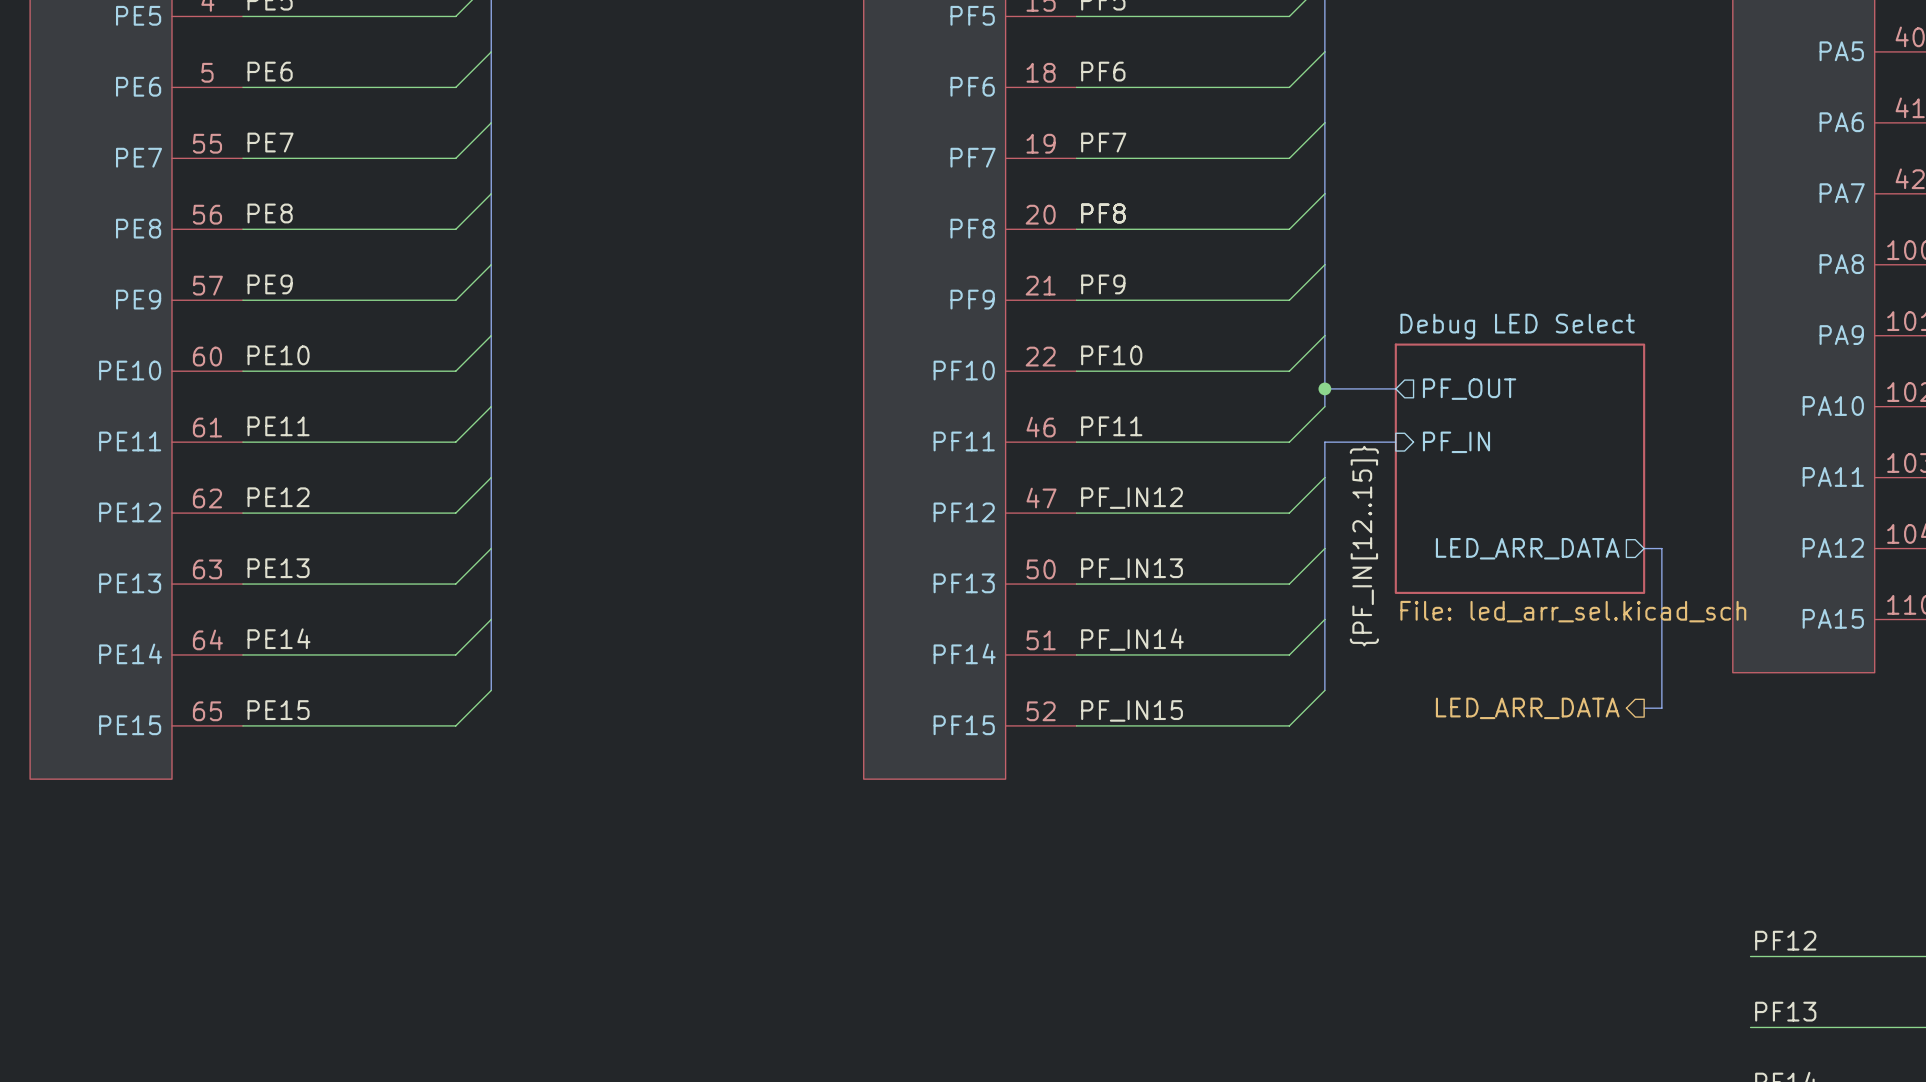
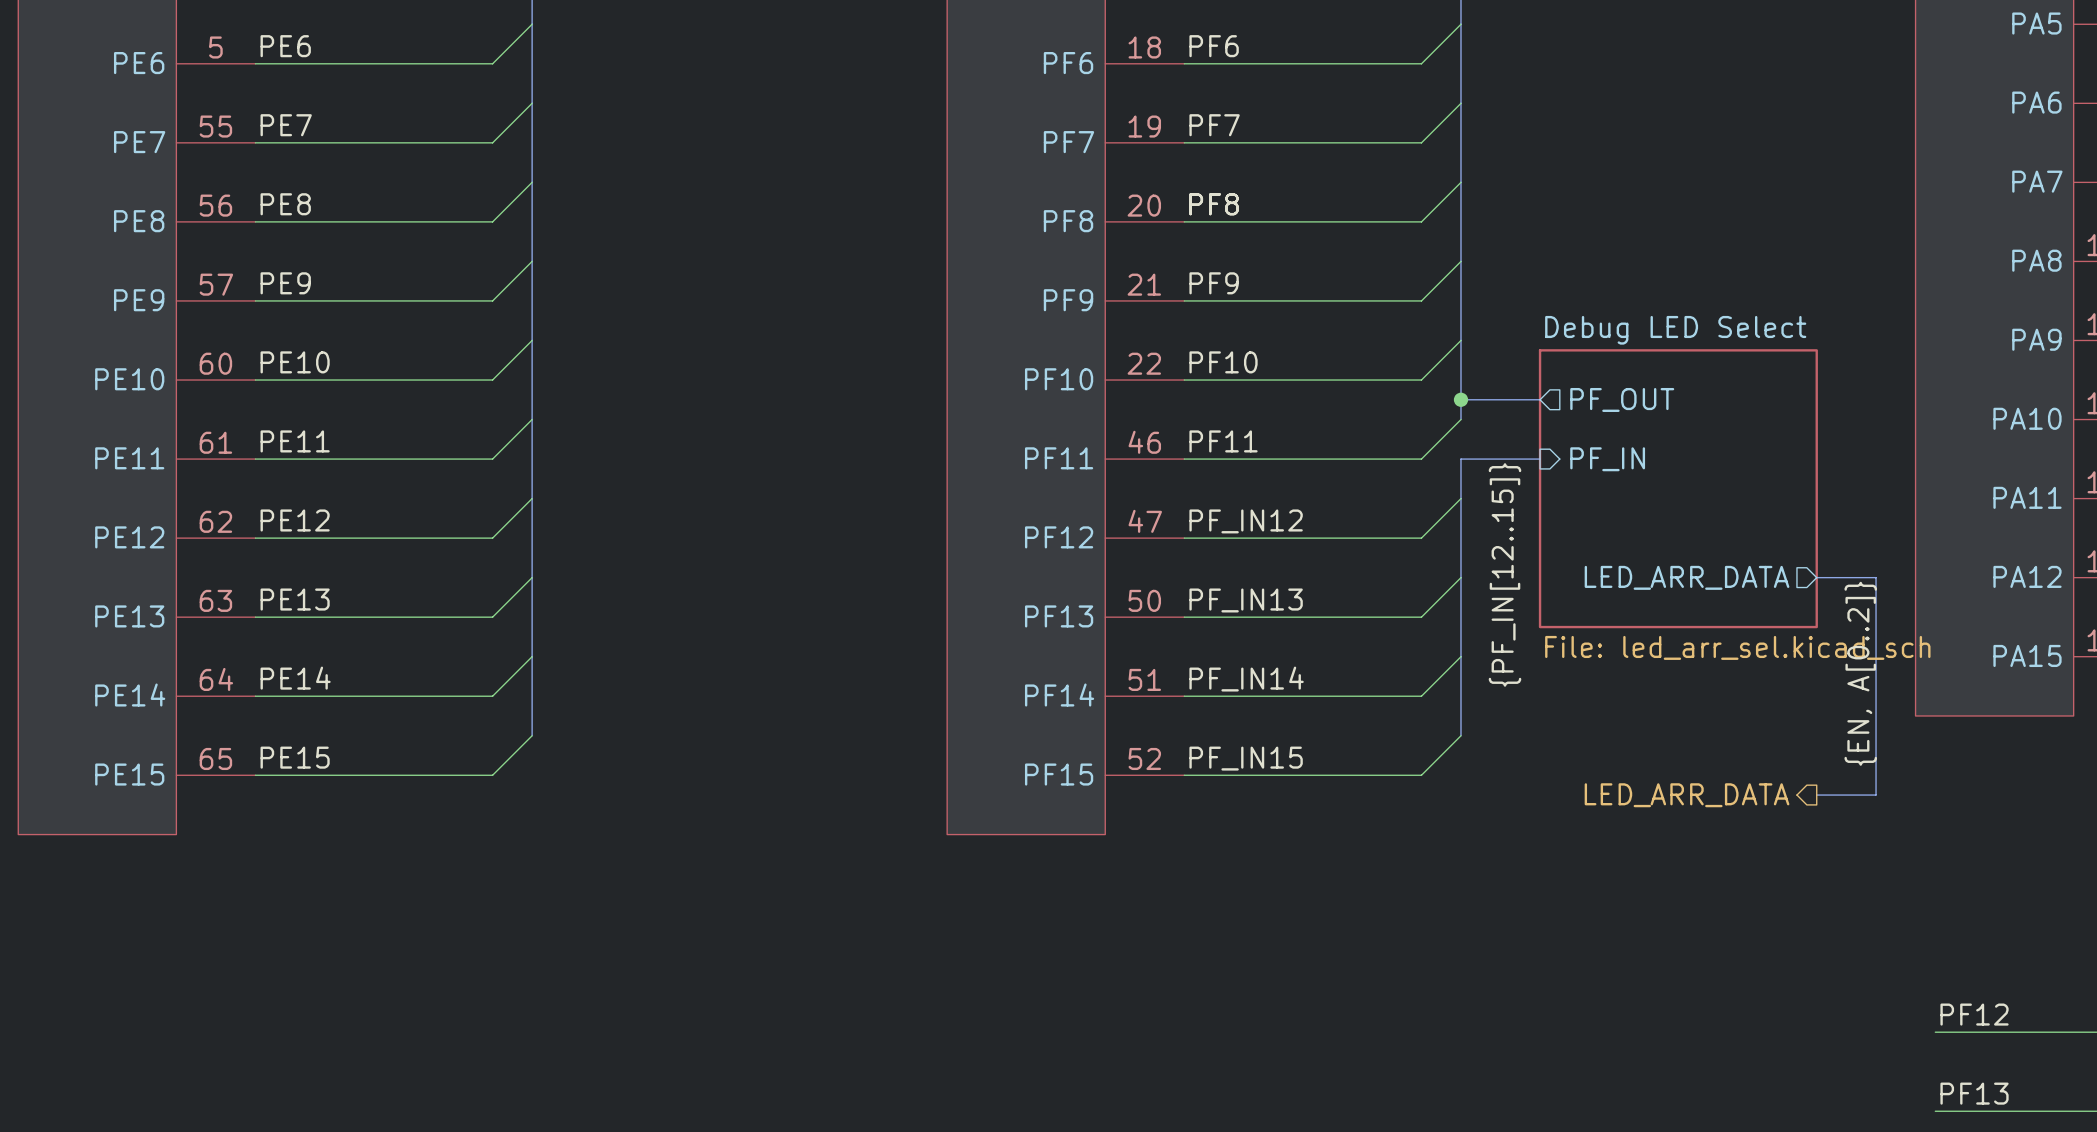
bus: (1661, 548) (1661, 708) (1644, 708) -> (1836, 577) (1876, 577) (1876, 795) (1816, 795)
label: none -> {EN, A[0..2]} (1860, 673)
hierarchical label position: LED_ARR_DATA (1527, 708) -> LED_ARR_DATA (1687, 795)

